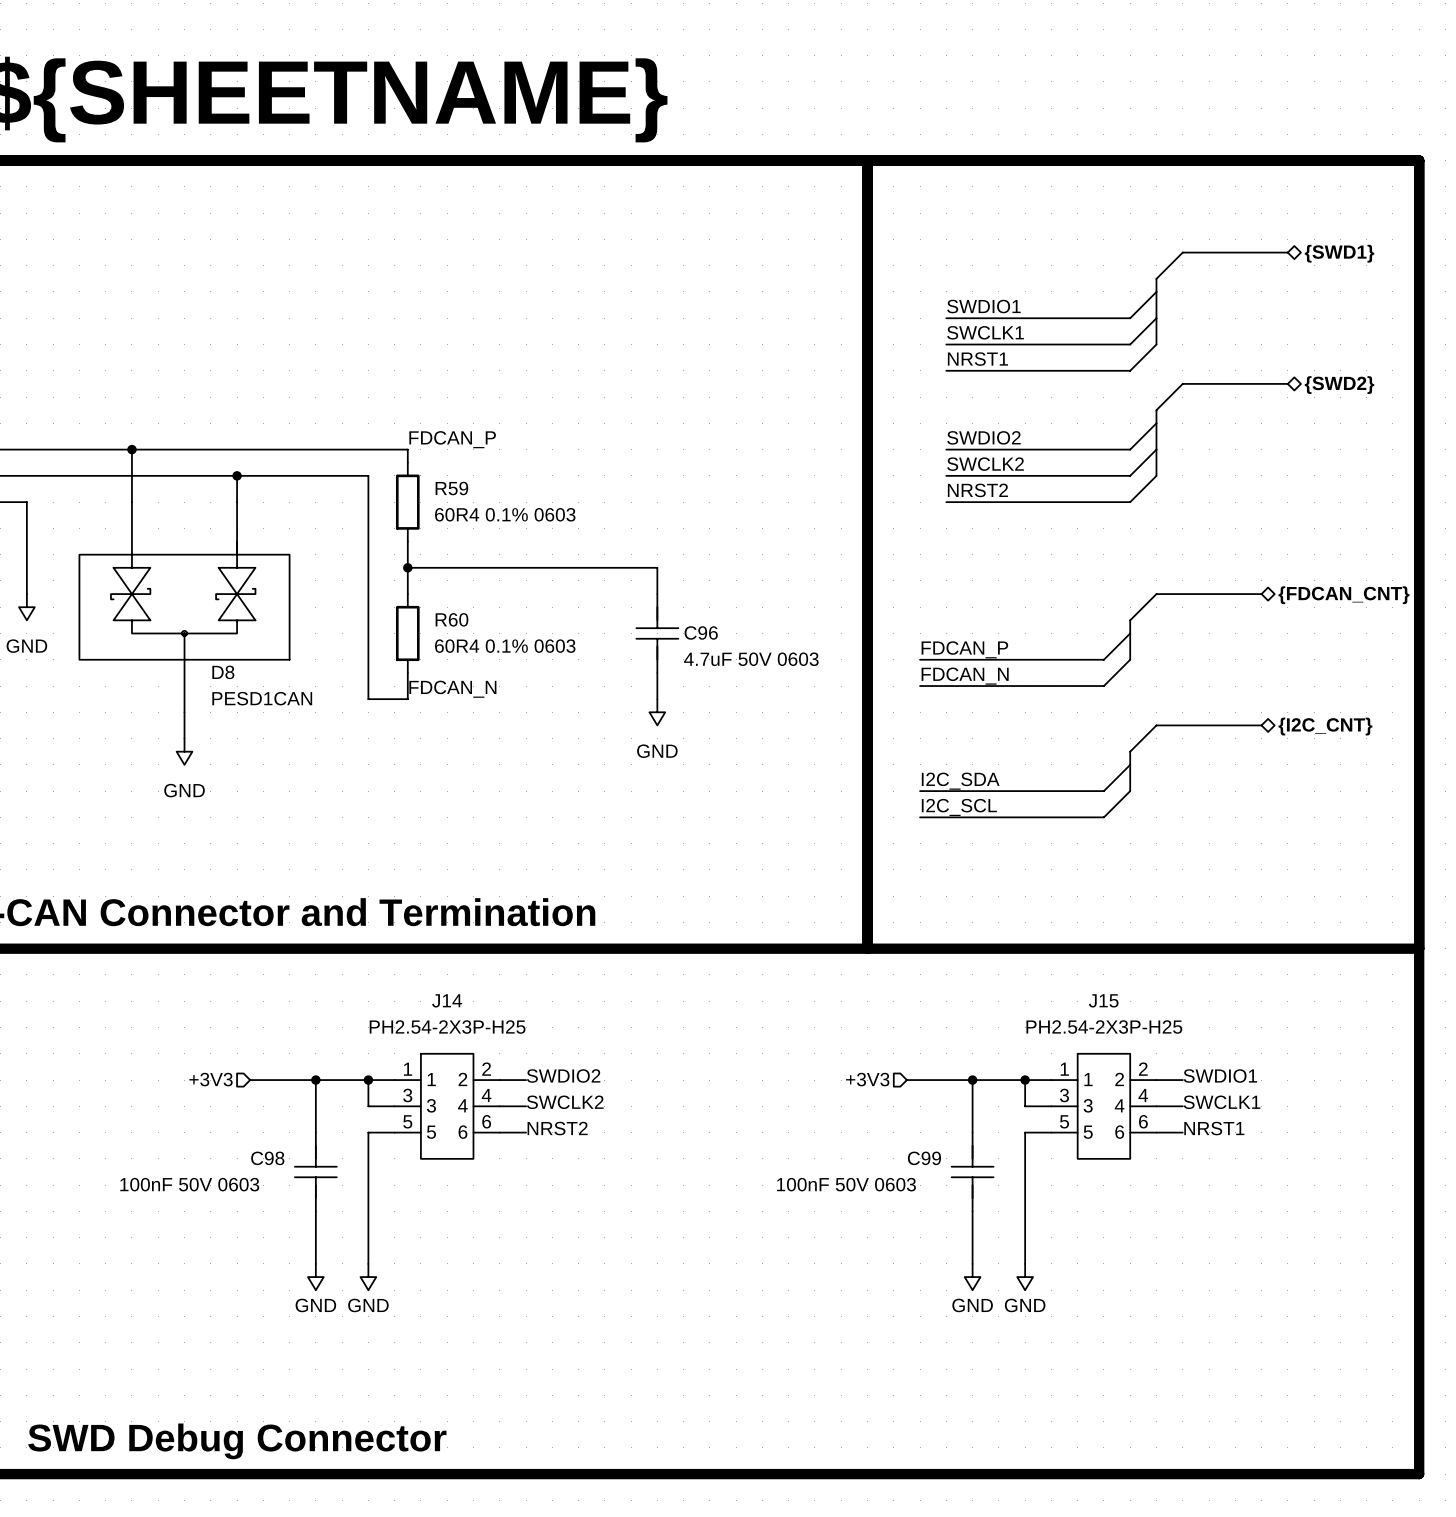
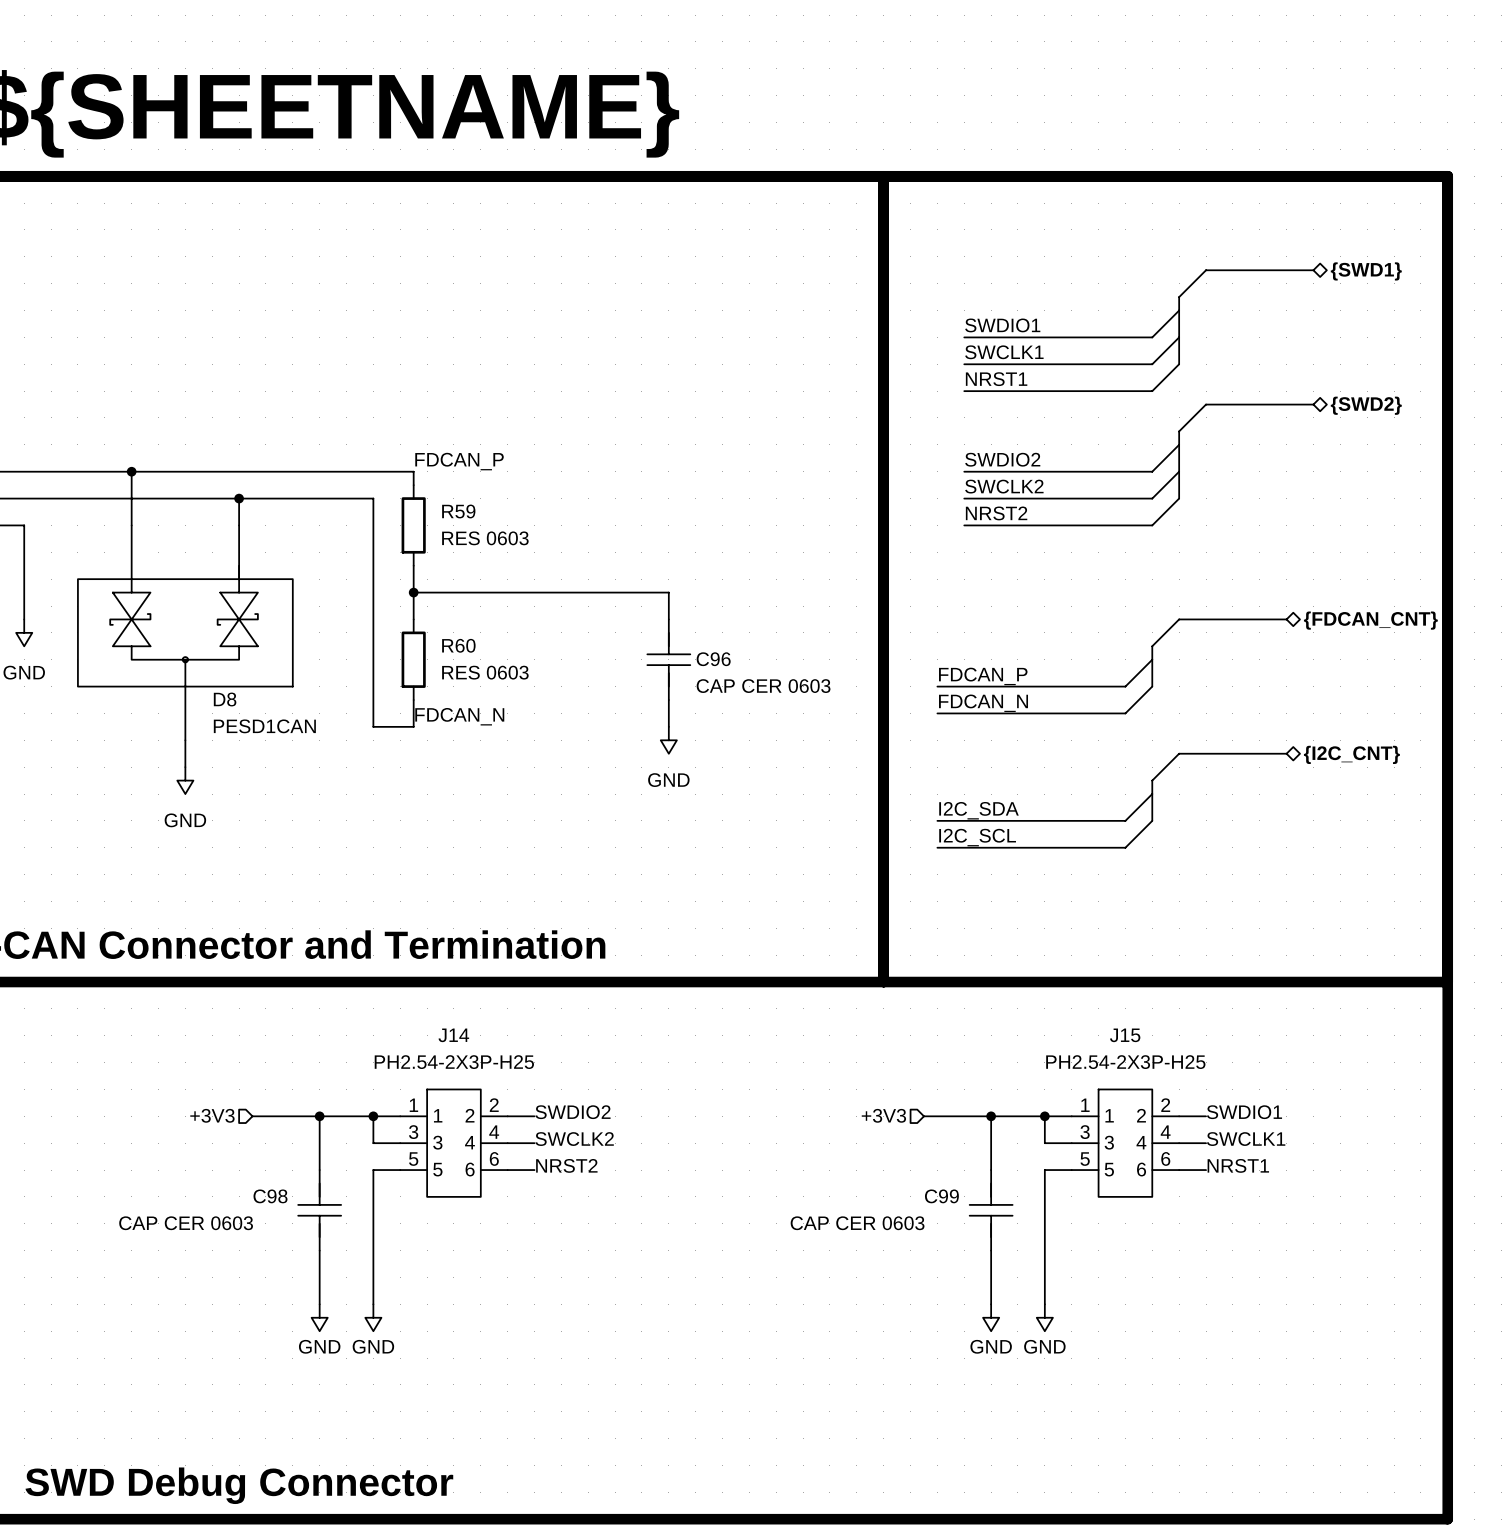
R59 value: 60R4 0.1% 0603 (505, 514) -> RES 0603 (485, 538)
R60 value: 60R4 0.1% 0603 (505, 646) -> RES 0603 (485, 672)
C96 value: 4.7uF 50V 0603 (751, 659) -> CAP CER 0603 (763, 686)
C98 value: 100nF 50V 0603 (189, 1184) -> CAP CER 0603 (186, 1223)
C99 value: 100nF 50V 0603 (846, 1184) -> CAP CER 0603 (857, 1223)

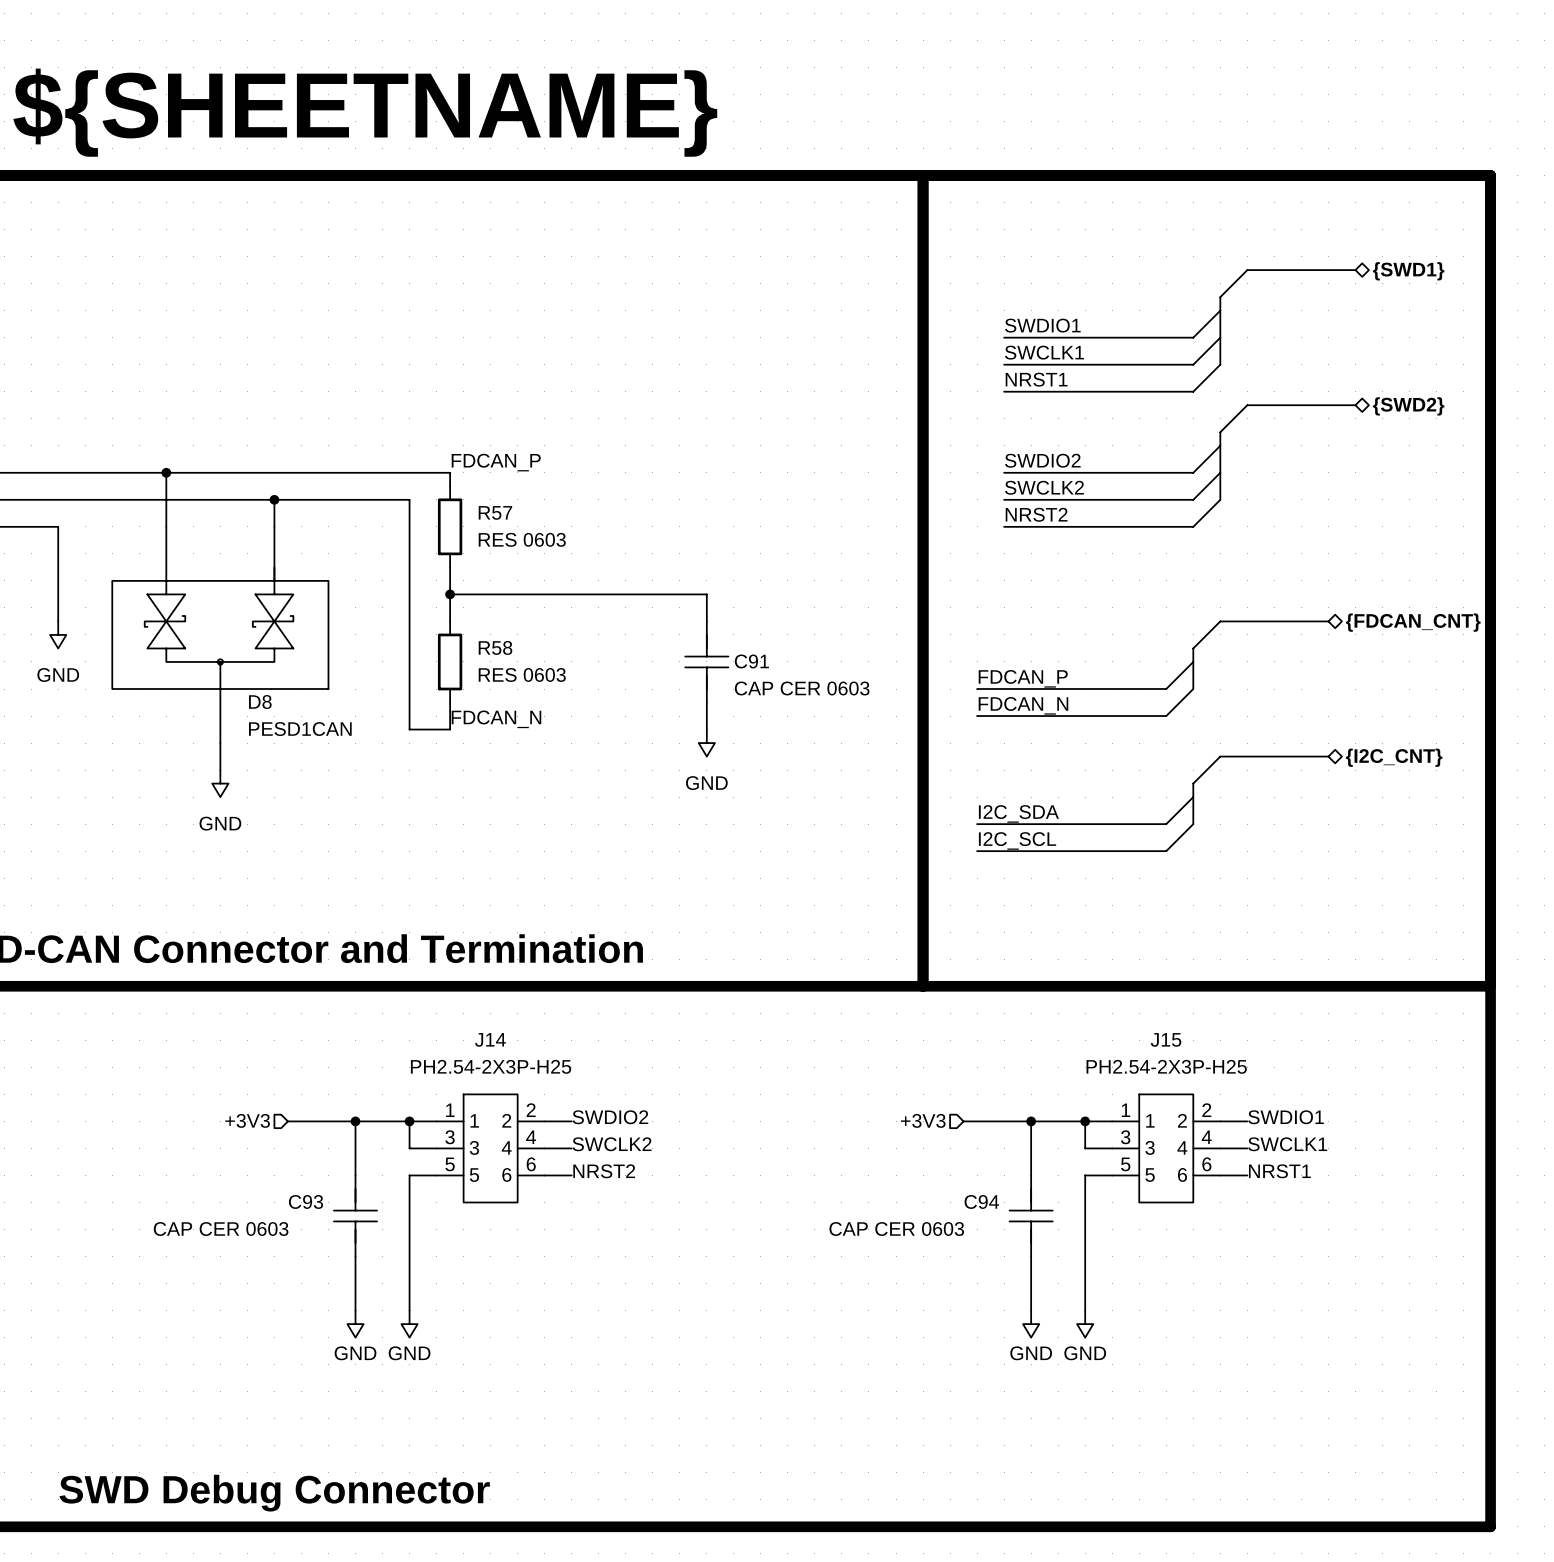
R59 name: R59 (458, 511) -> R57 (495, 512)
R60 name: R60 (458, 645) -> R58 (495, 647)
C96 name: C96 (713, 659) -> C91 (751, 661)
C98 name: C98 (270, 1196) -> C93 (306, 1201)
C99 name: C99 (941, 1196) -> C94 (981, 1201)

